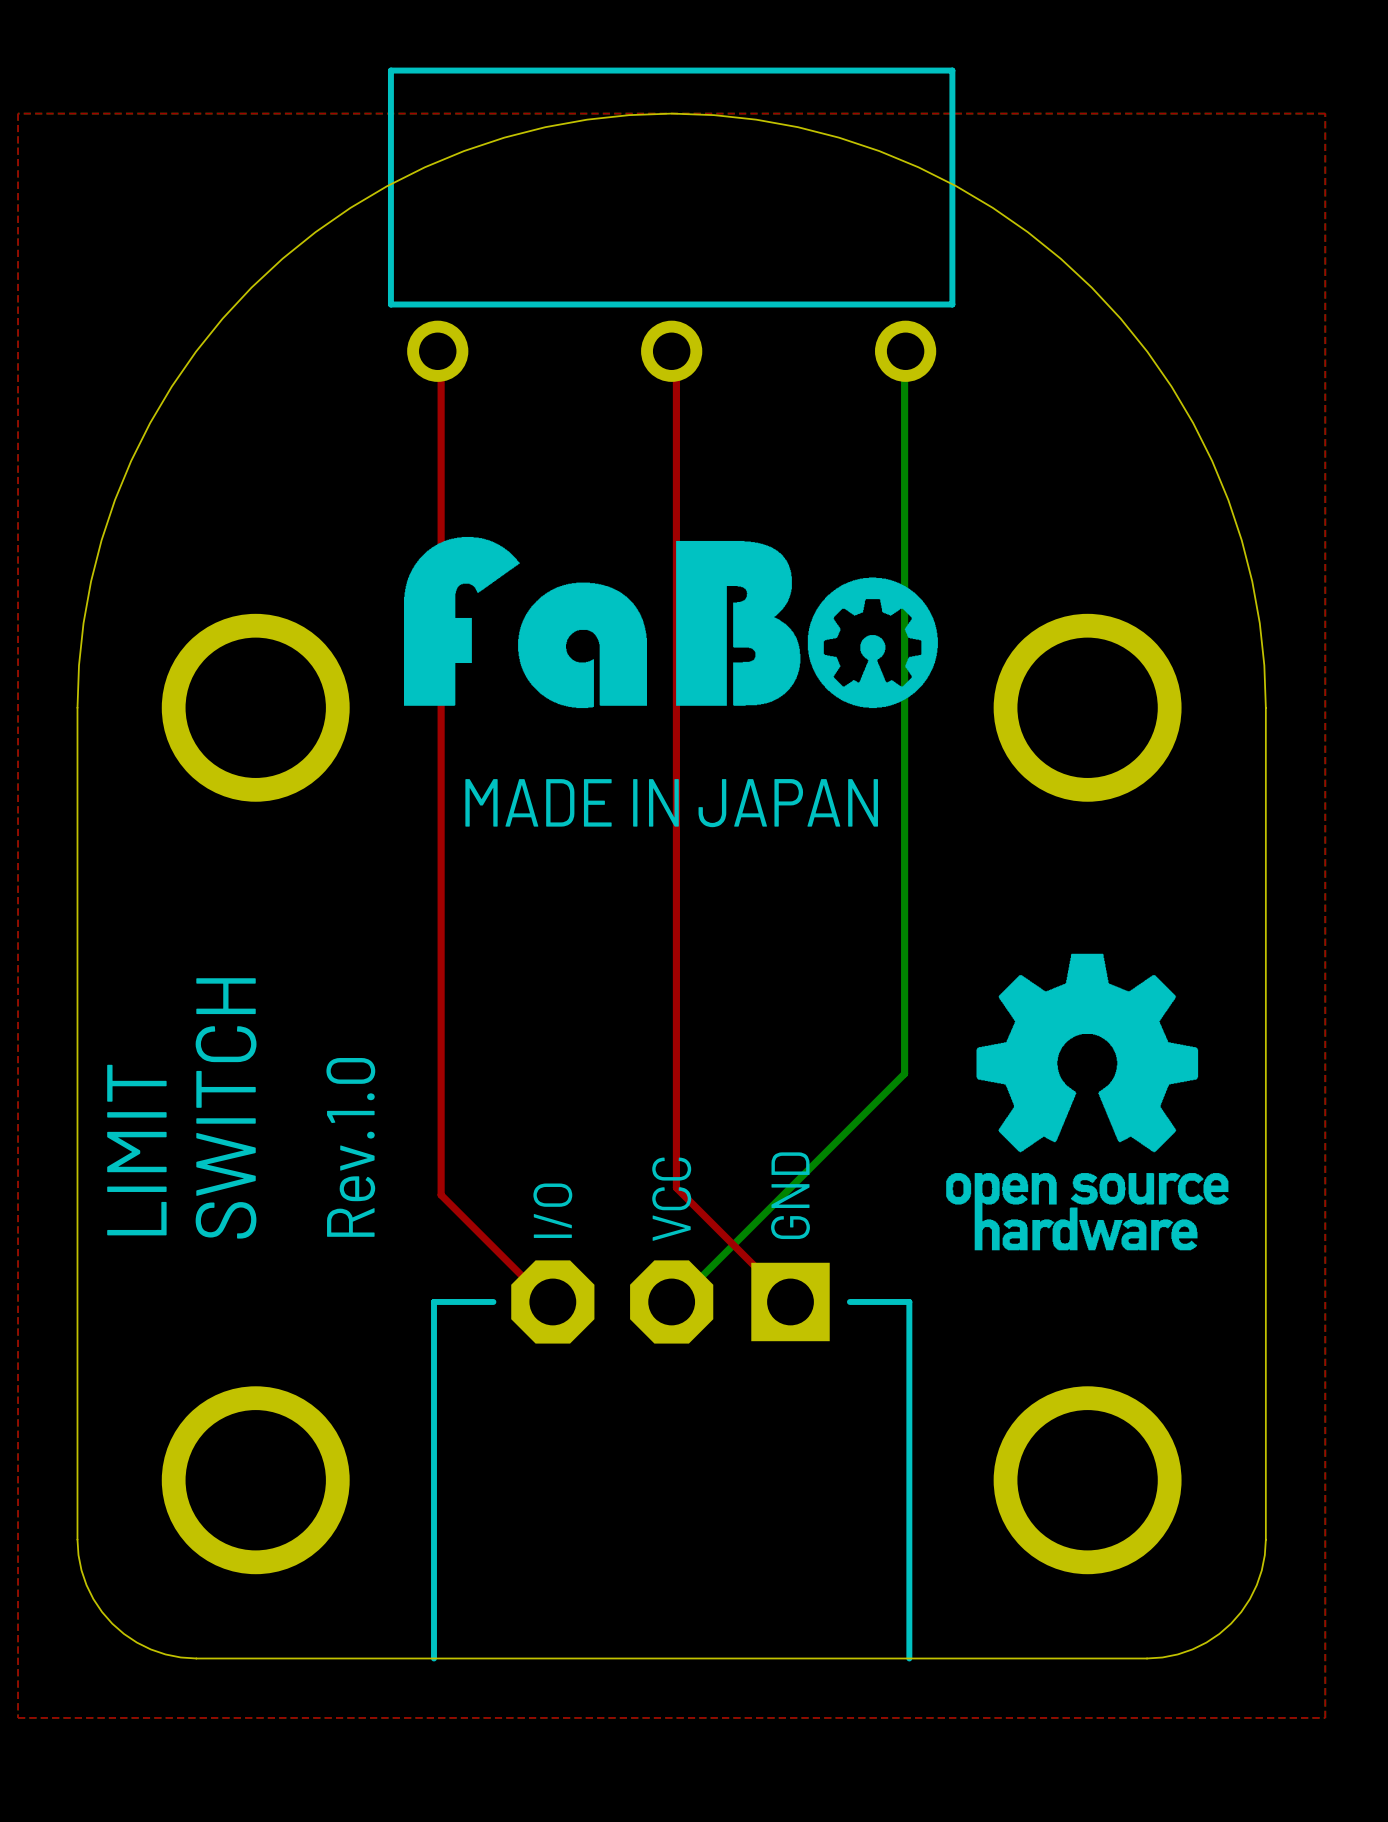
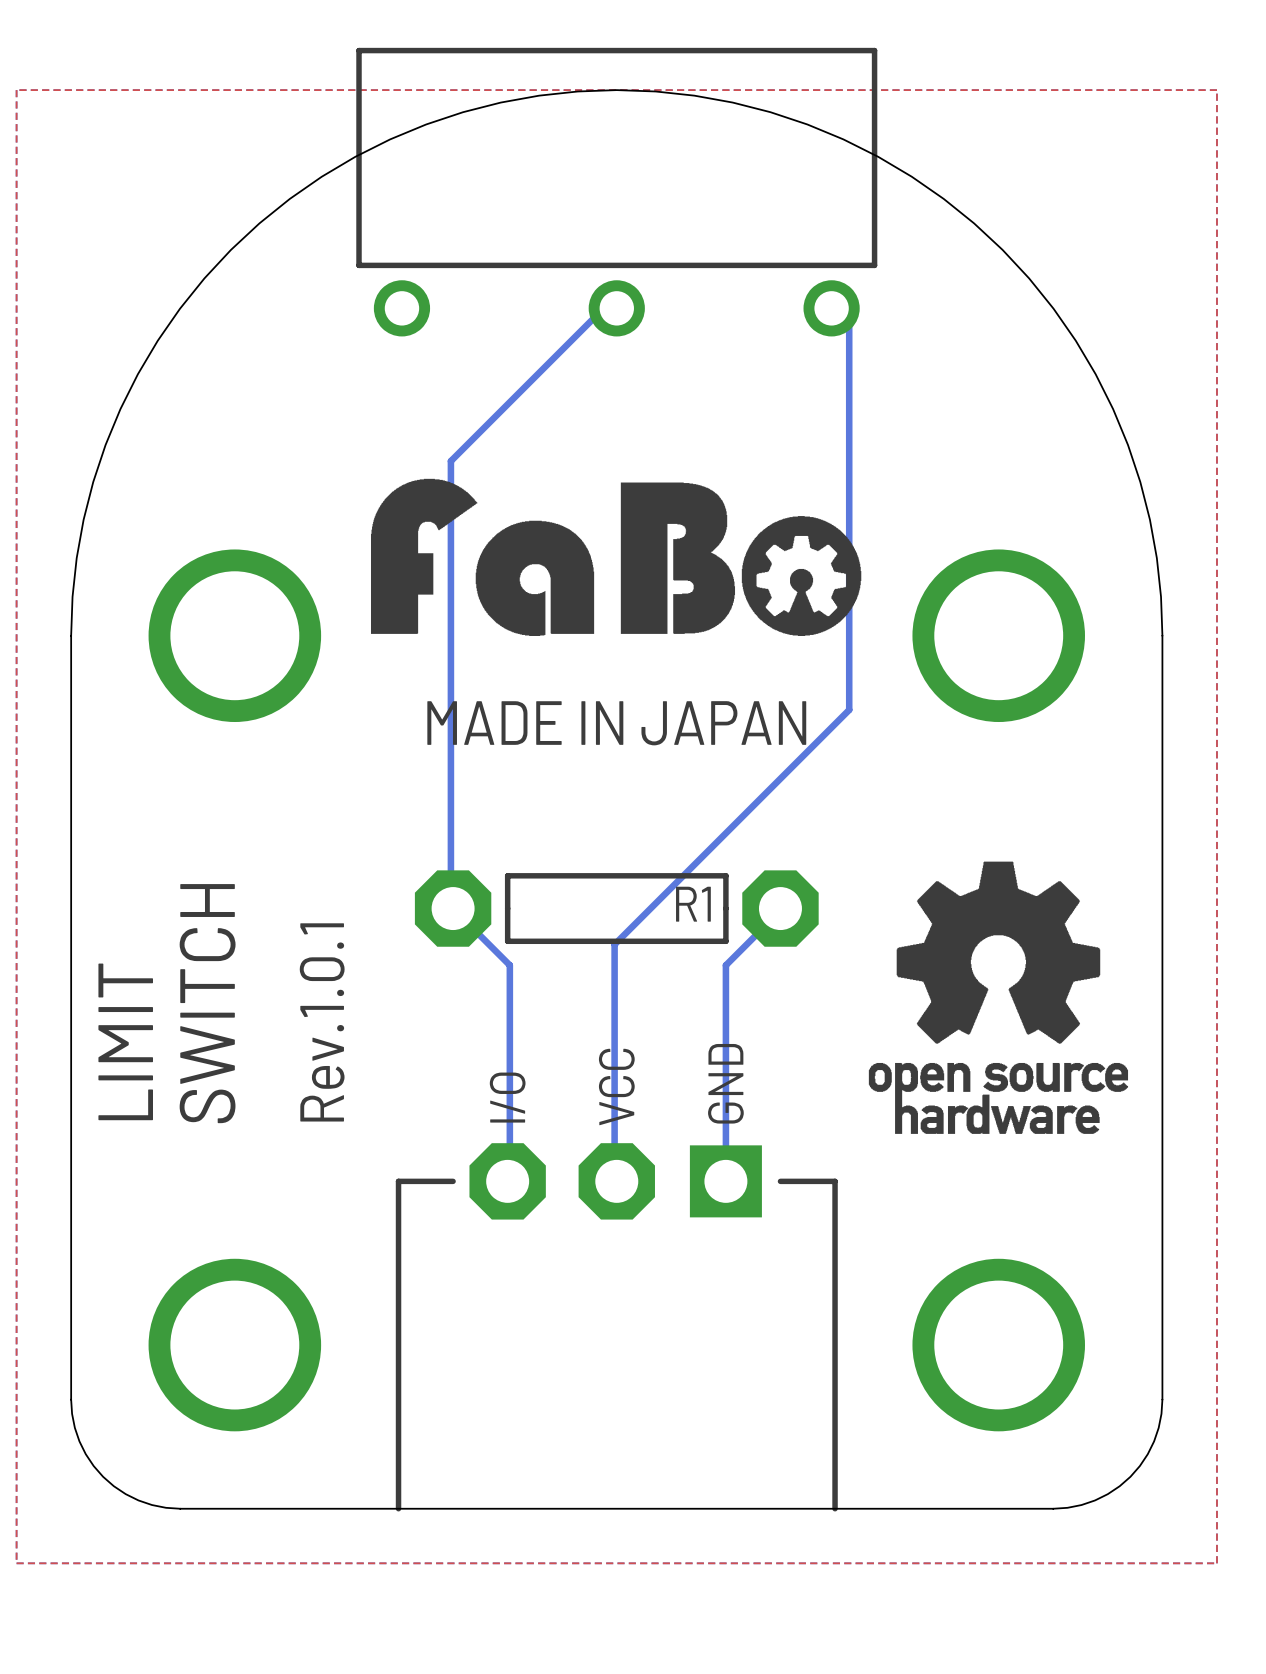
top track: (437, 351) (441, 353) (441, 1195) (548, 1301) (552, 1301) -> none
bottom track: none -> (616, 308) (614, 310) (601, 310) (450, 461) (450, 906) (509, 965) (509, 1181) (507, 1181)
top track: (671, 351) (676, 353) (676, 1187) (790, 1301) -> none
bottom track: (905, 351) (904, 1073) (676, 1301) (671, 1301) -> (831, 308) (837, 310) (849, 322) (849, 709) (614, 944) (614, 1181) (616, 1181)
R1: none -> (616, 908)
bottom track: none -> (780, 908) (725, 965) (725, 1181)
text: Rev.1.0 (350, 1147) -> Rev.1.0.1 (322, 1022)

